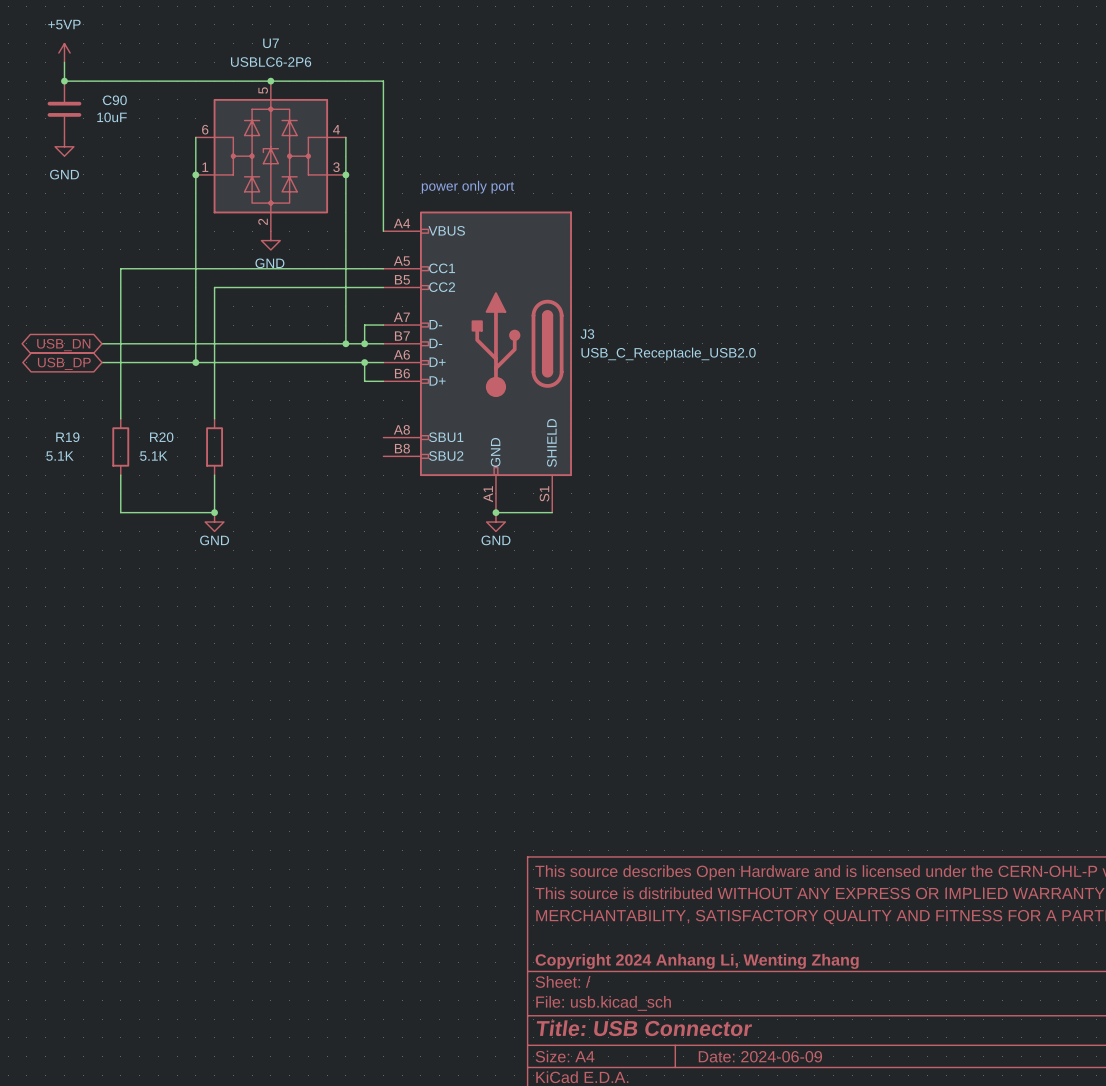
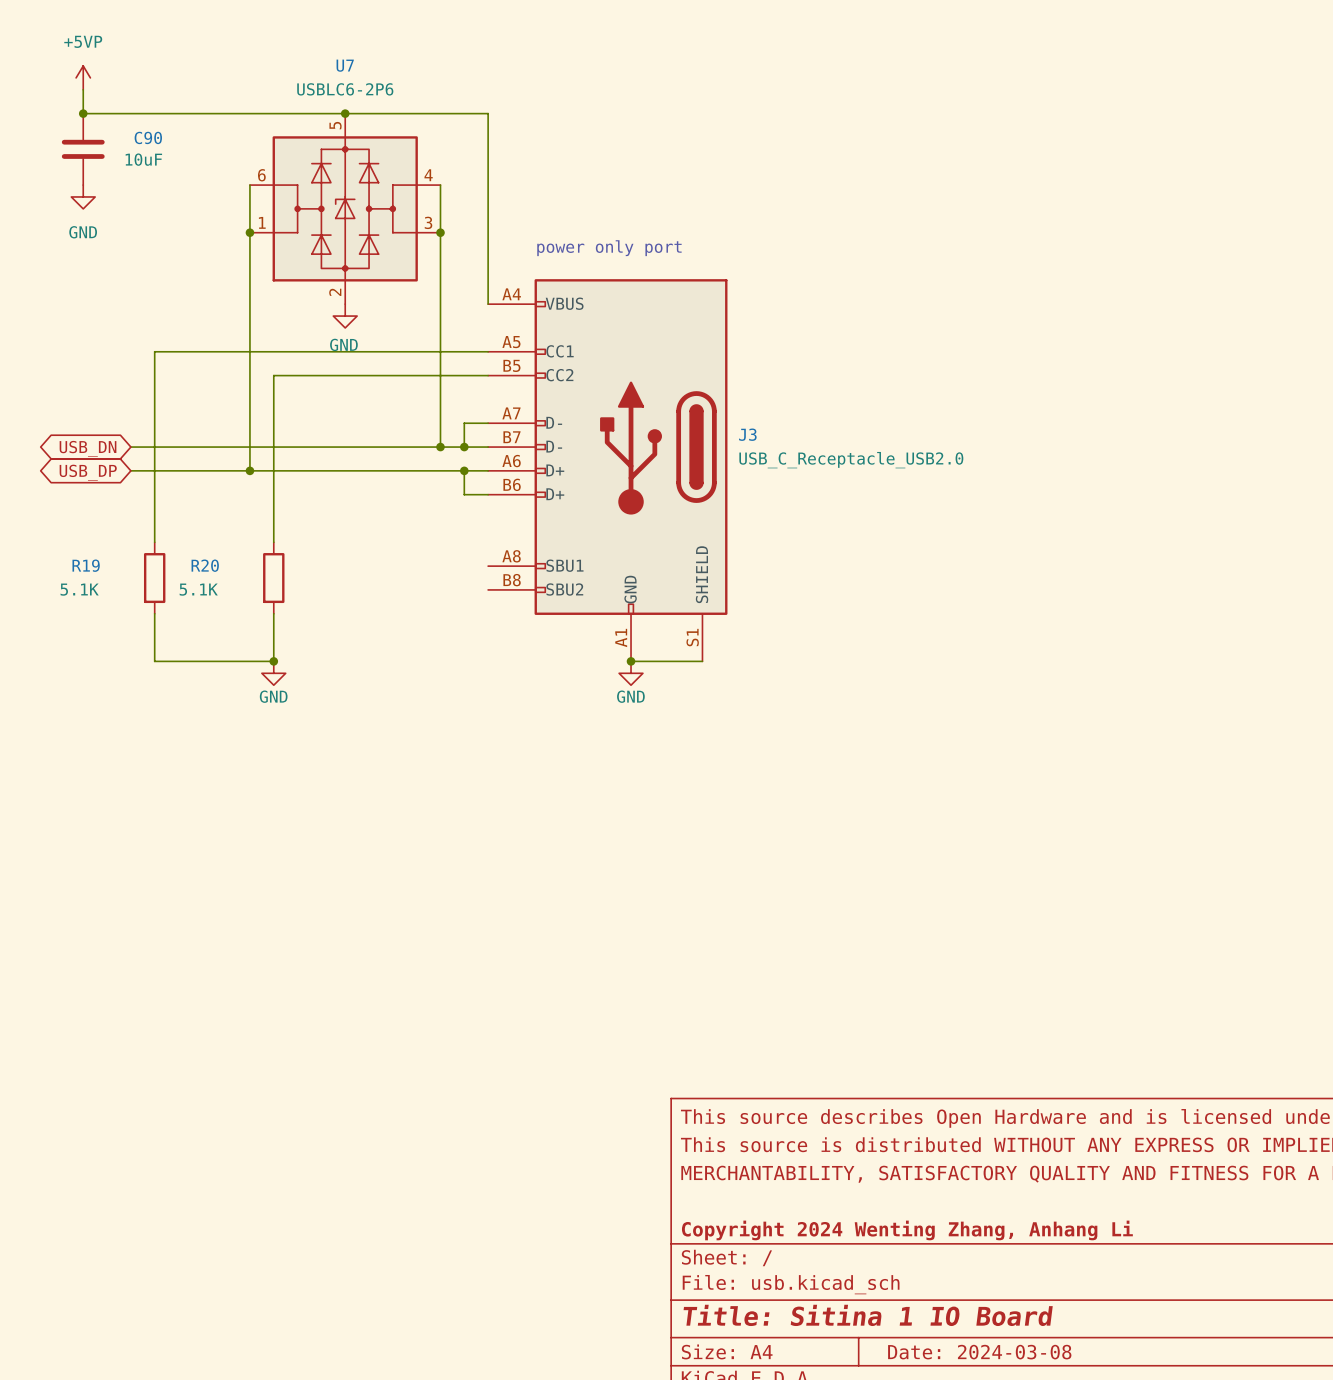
title block: Copyright 2024 Anhang Li, Wenting Zhang (697, 961) -> Copyright 2024 Wenting Zhang, Anhang Li (907, 1230)
title block: Title: USB Connector (644, 1028) -> Title: Sitina 1 IO Board (868, 1315)
title block: Date: 2024-06-09 (760, 1056) -> Date: 2024-03-08 (979, 1352)

